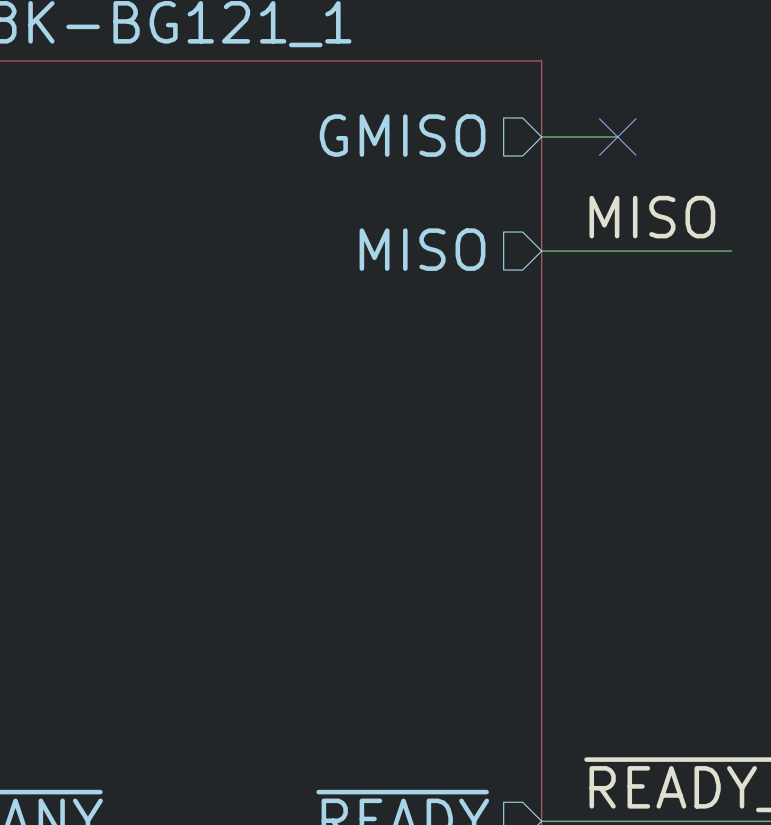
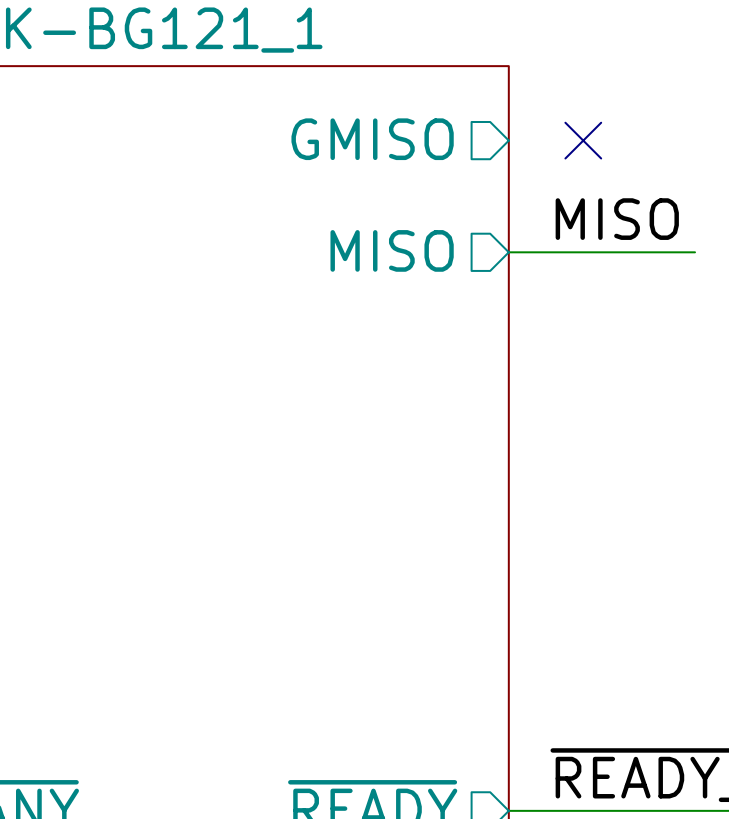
wire: (541, 136) (617, 136) -> none

